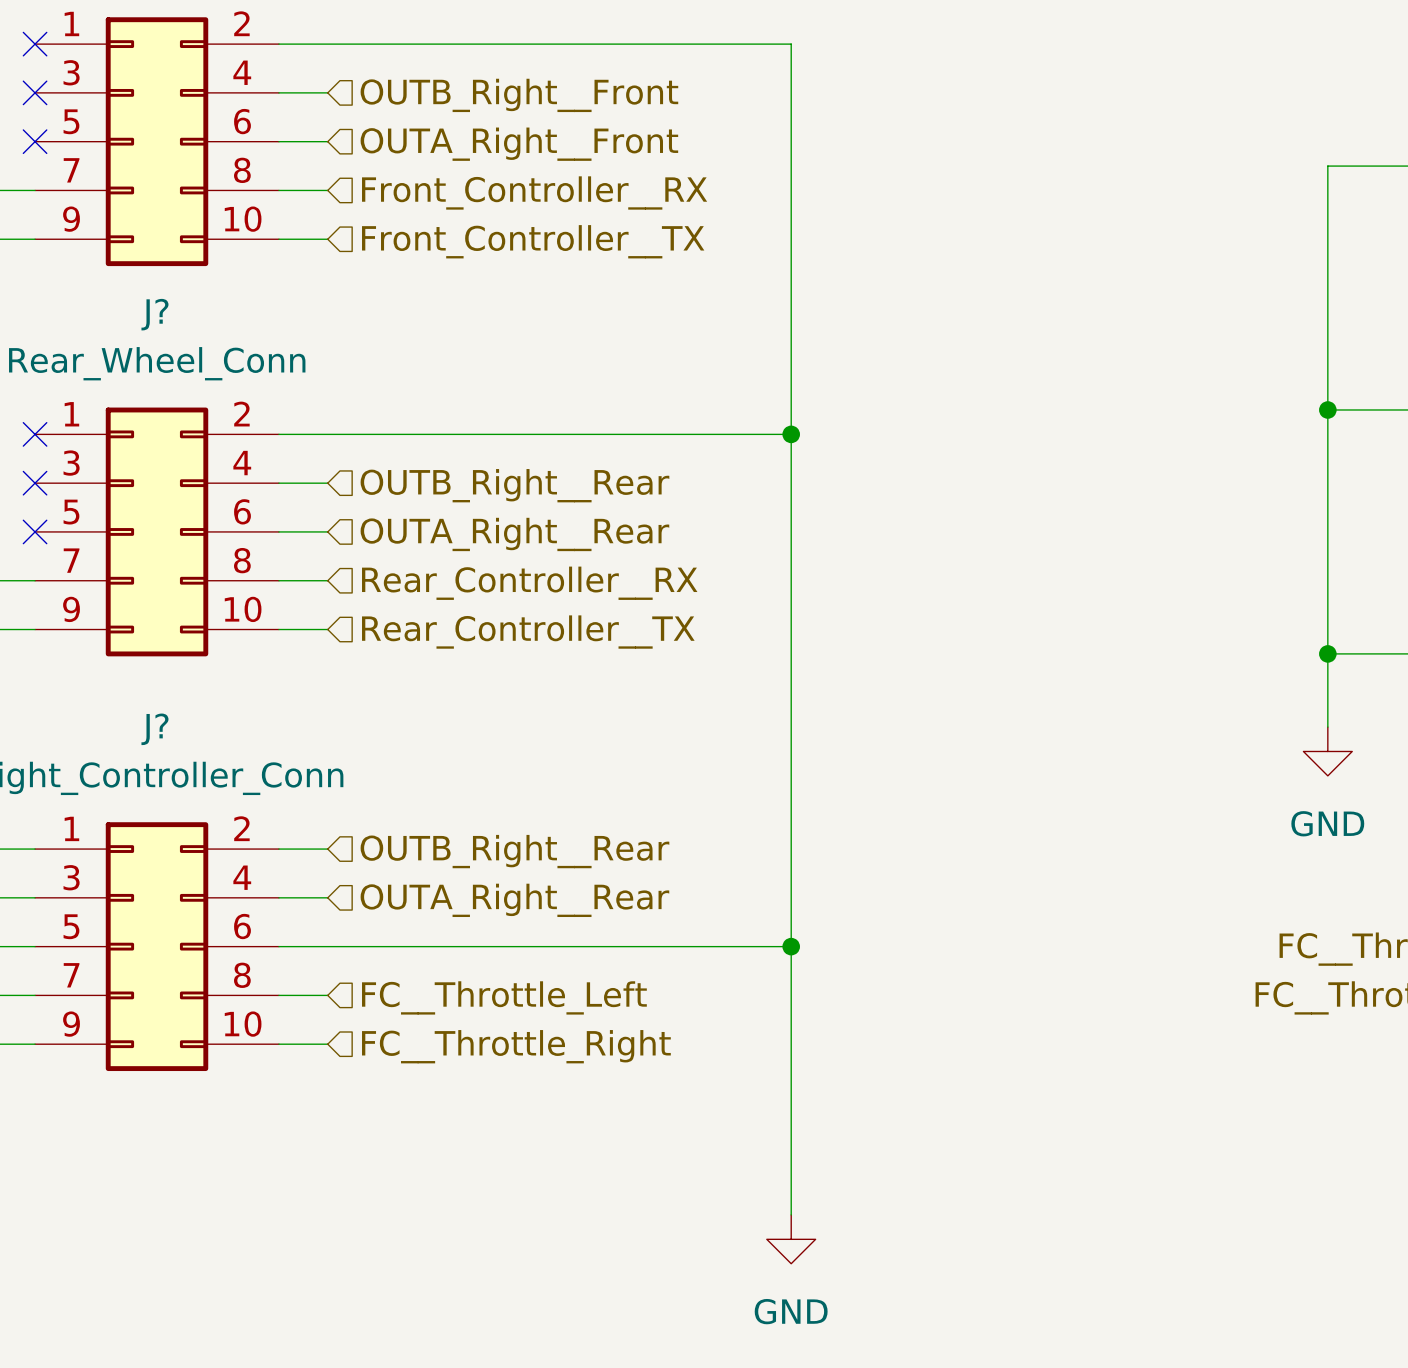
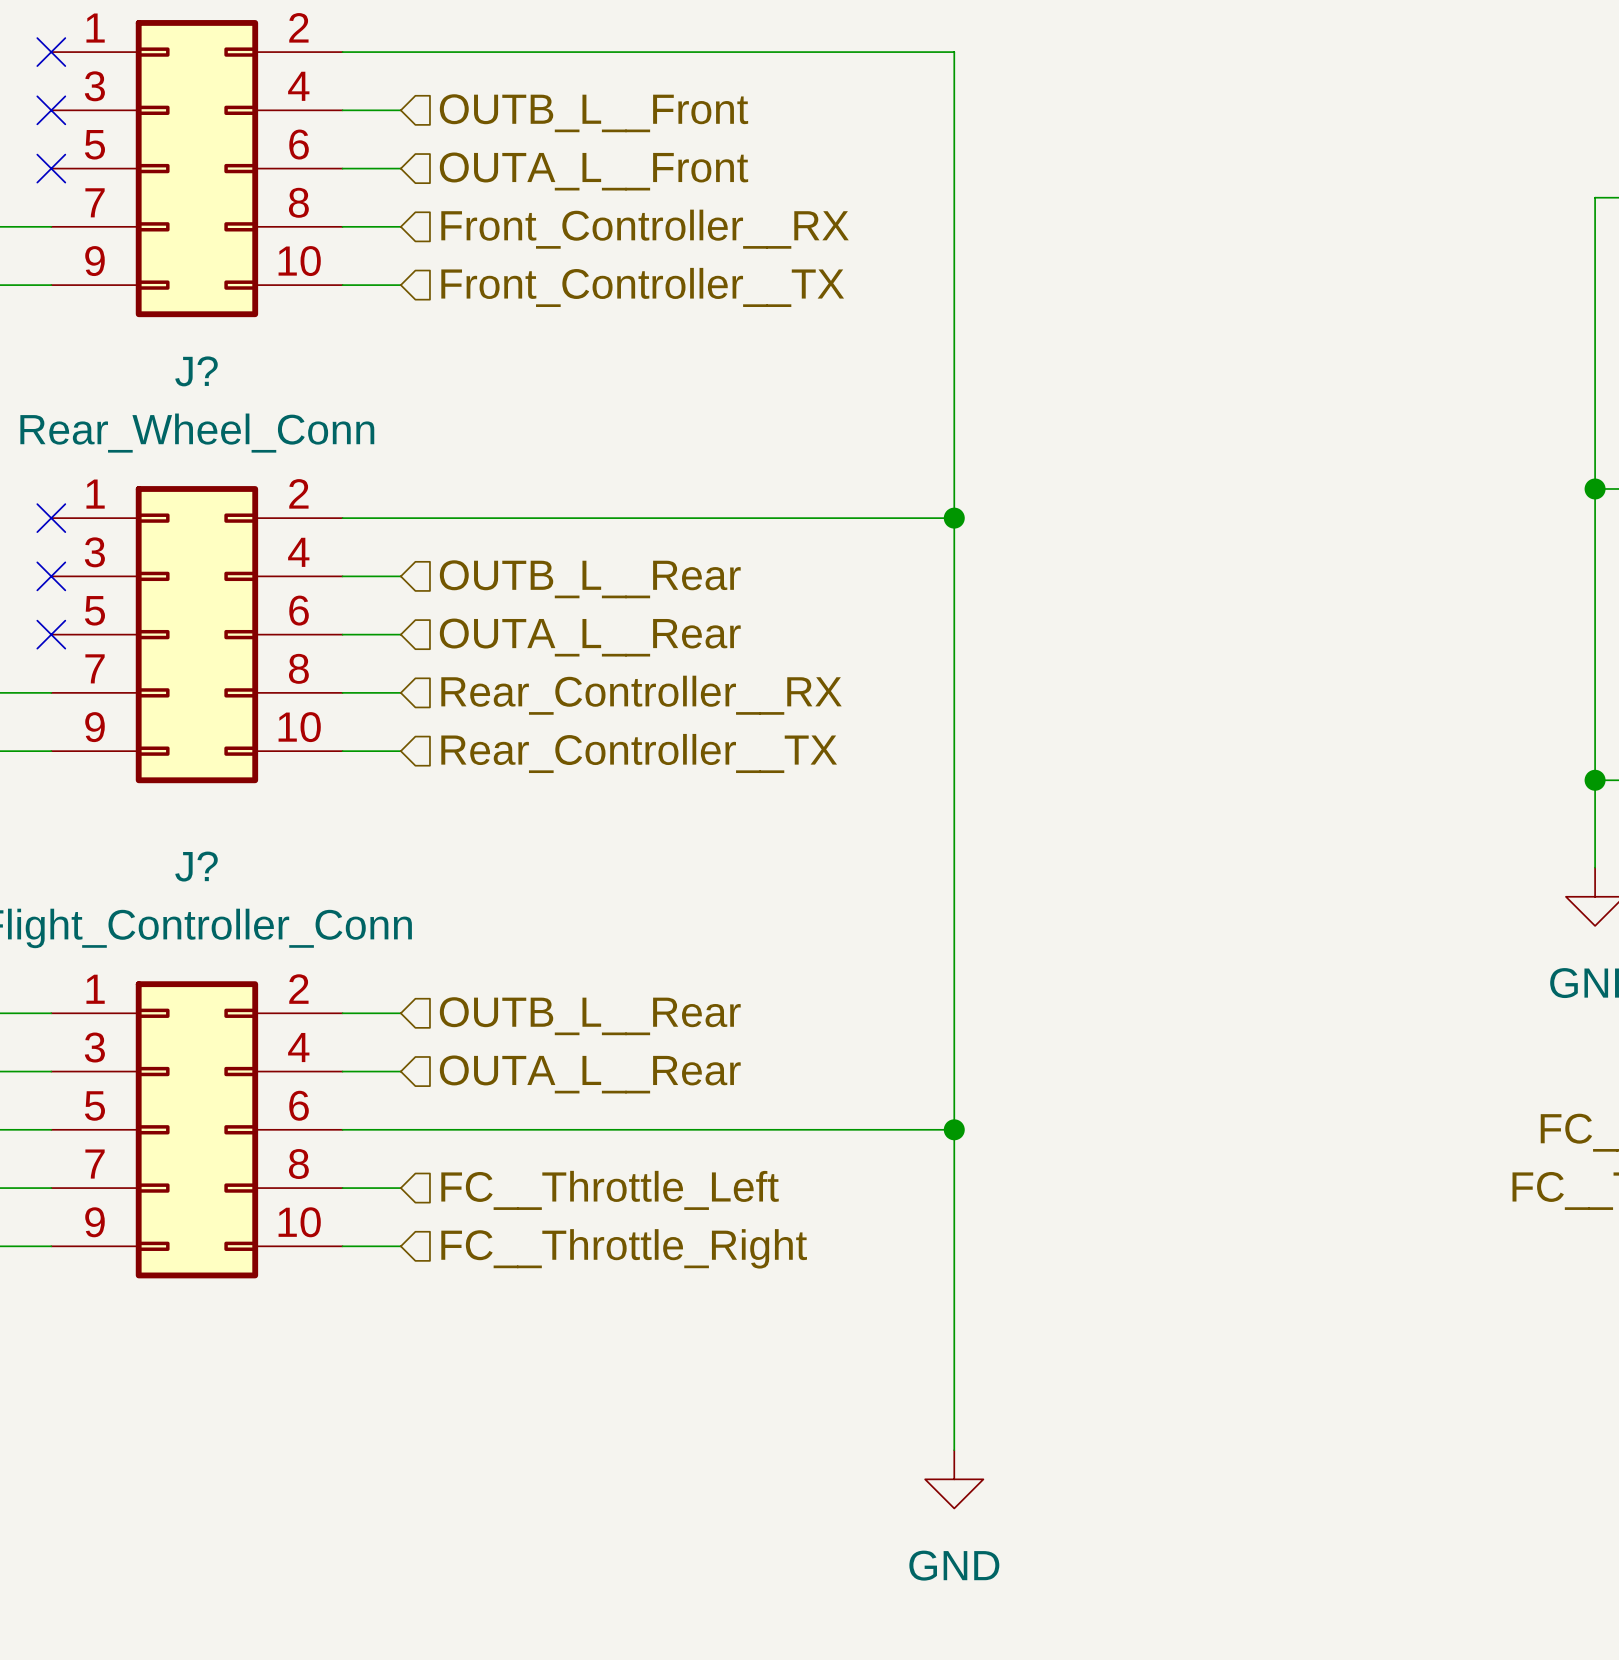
hierarchical label: OUTB_Right__Front (519, 95) -> OUTB_L__Front (593, 113)
hierarchical label: OUTA_Right__Front (519, 144) -> OUTA_L__Front (593, 171)
hierarchical label: OUTB_Right__Rear (514, 485) -> OUTB_L__Rear (590, 579)
hierarchical label: OUTA_Right__Rear (514, 534) -> OUTA_L__Rear (590, 637)
hierarchical label: OUTB_Right__Rear (514, 851) -> OUTB_L__Rear (590, 1016)
hierarchical label: OUTA_Right__Rear (514, 900) -> OUTA_L__Rear (590, 1074)

